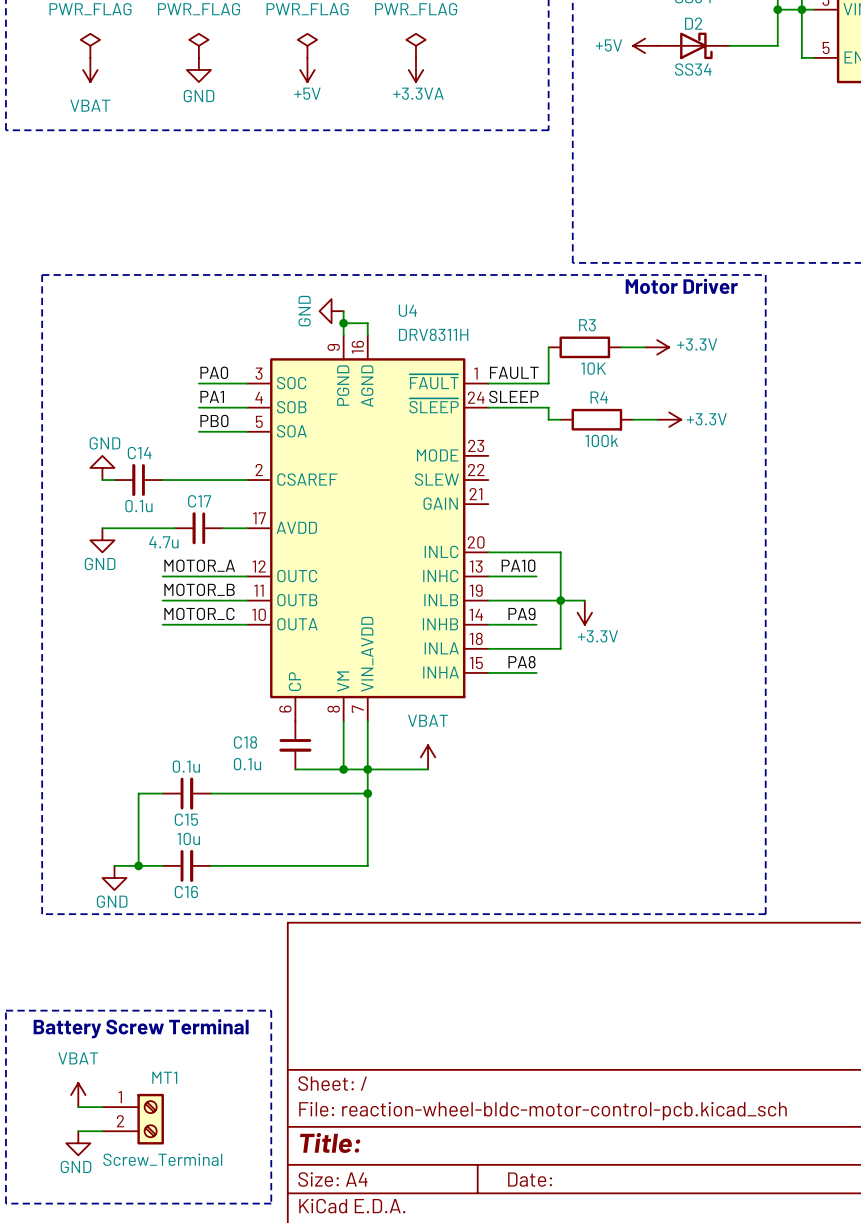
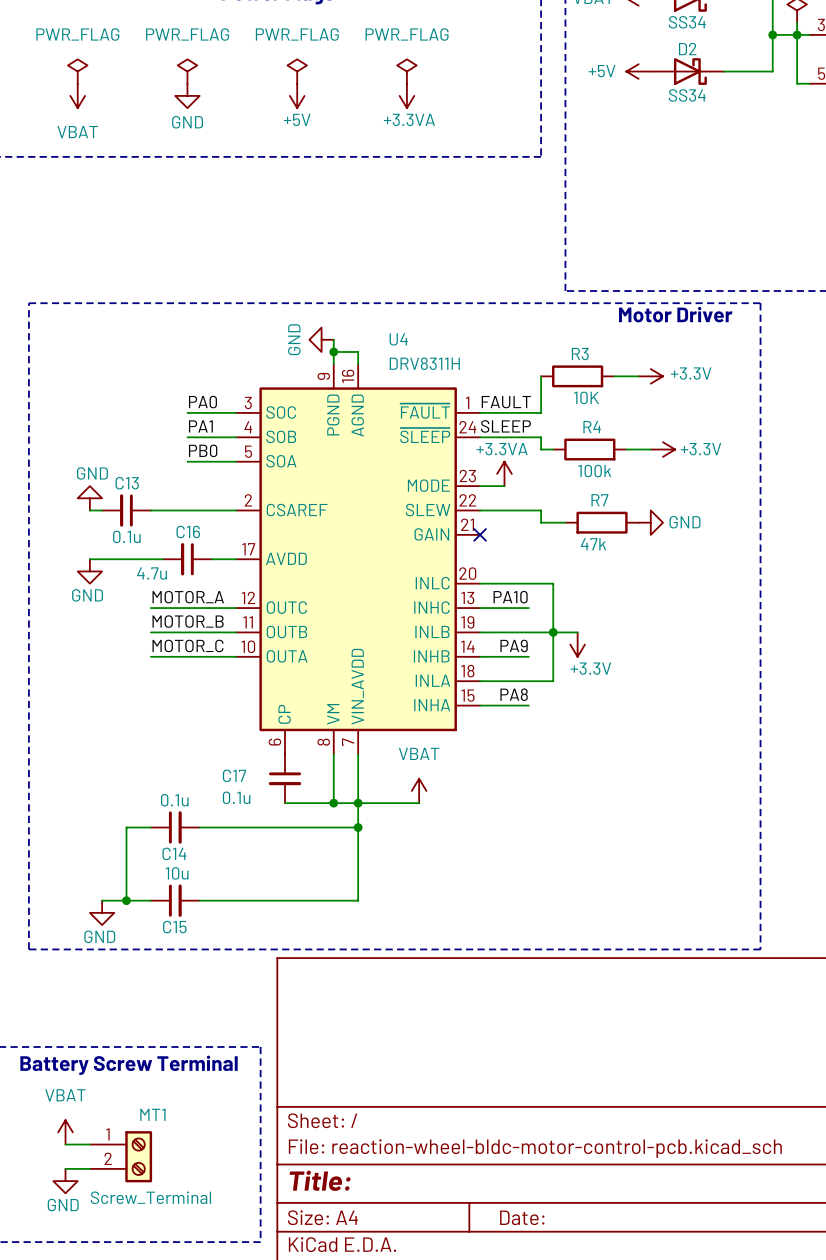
power symbol: none -> +3.3VA (504, 473)
C14 name: C14 (139, 453) -> C13 (127, 483)
wire: none -> (480, 486) (504, 486)
wire: none -> (480, 510) (541, 510) (541, 522) (565, 522)
R7: none -> 47k (602, 522)
power symbol: none -> GND (650, 522)
C17 name: C17 (199, 501) -> C16 (188, 531)
no-connect mark: none -> (480, 534)
C18 name: C18 (245, 742) -> C17 (234, 775)
C15 name: C15 (186, 819) -> C14 (174, 853)
C16 name: C16 (186, 892) -> C15 (174, 927)

